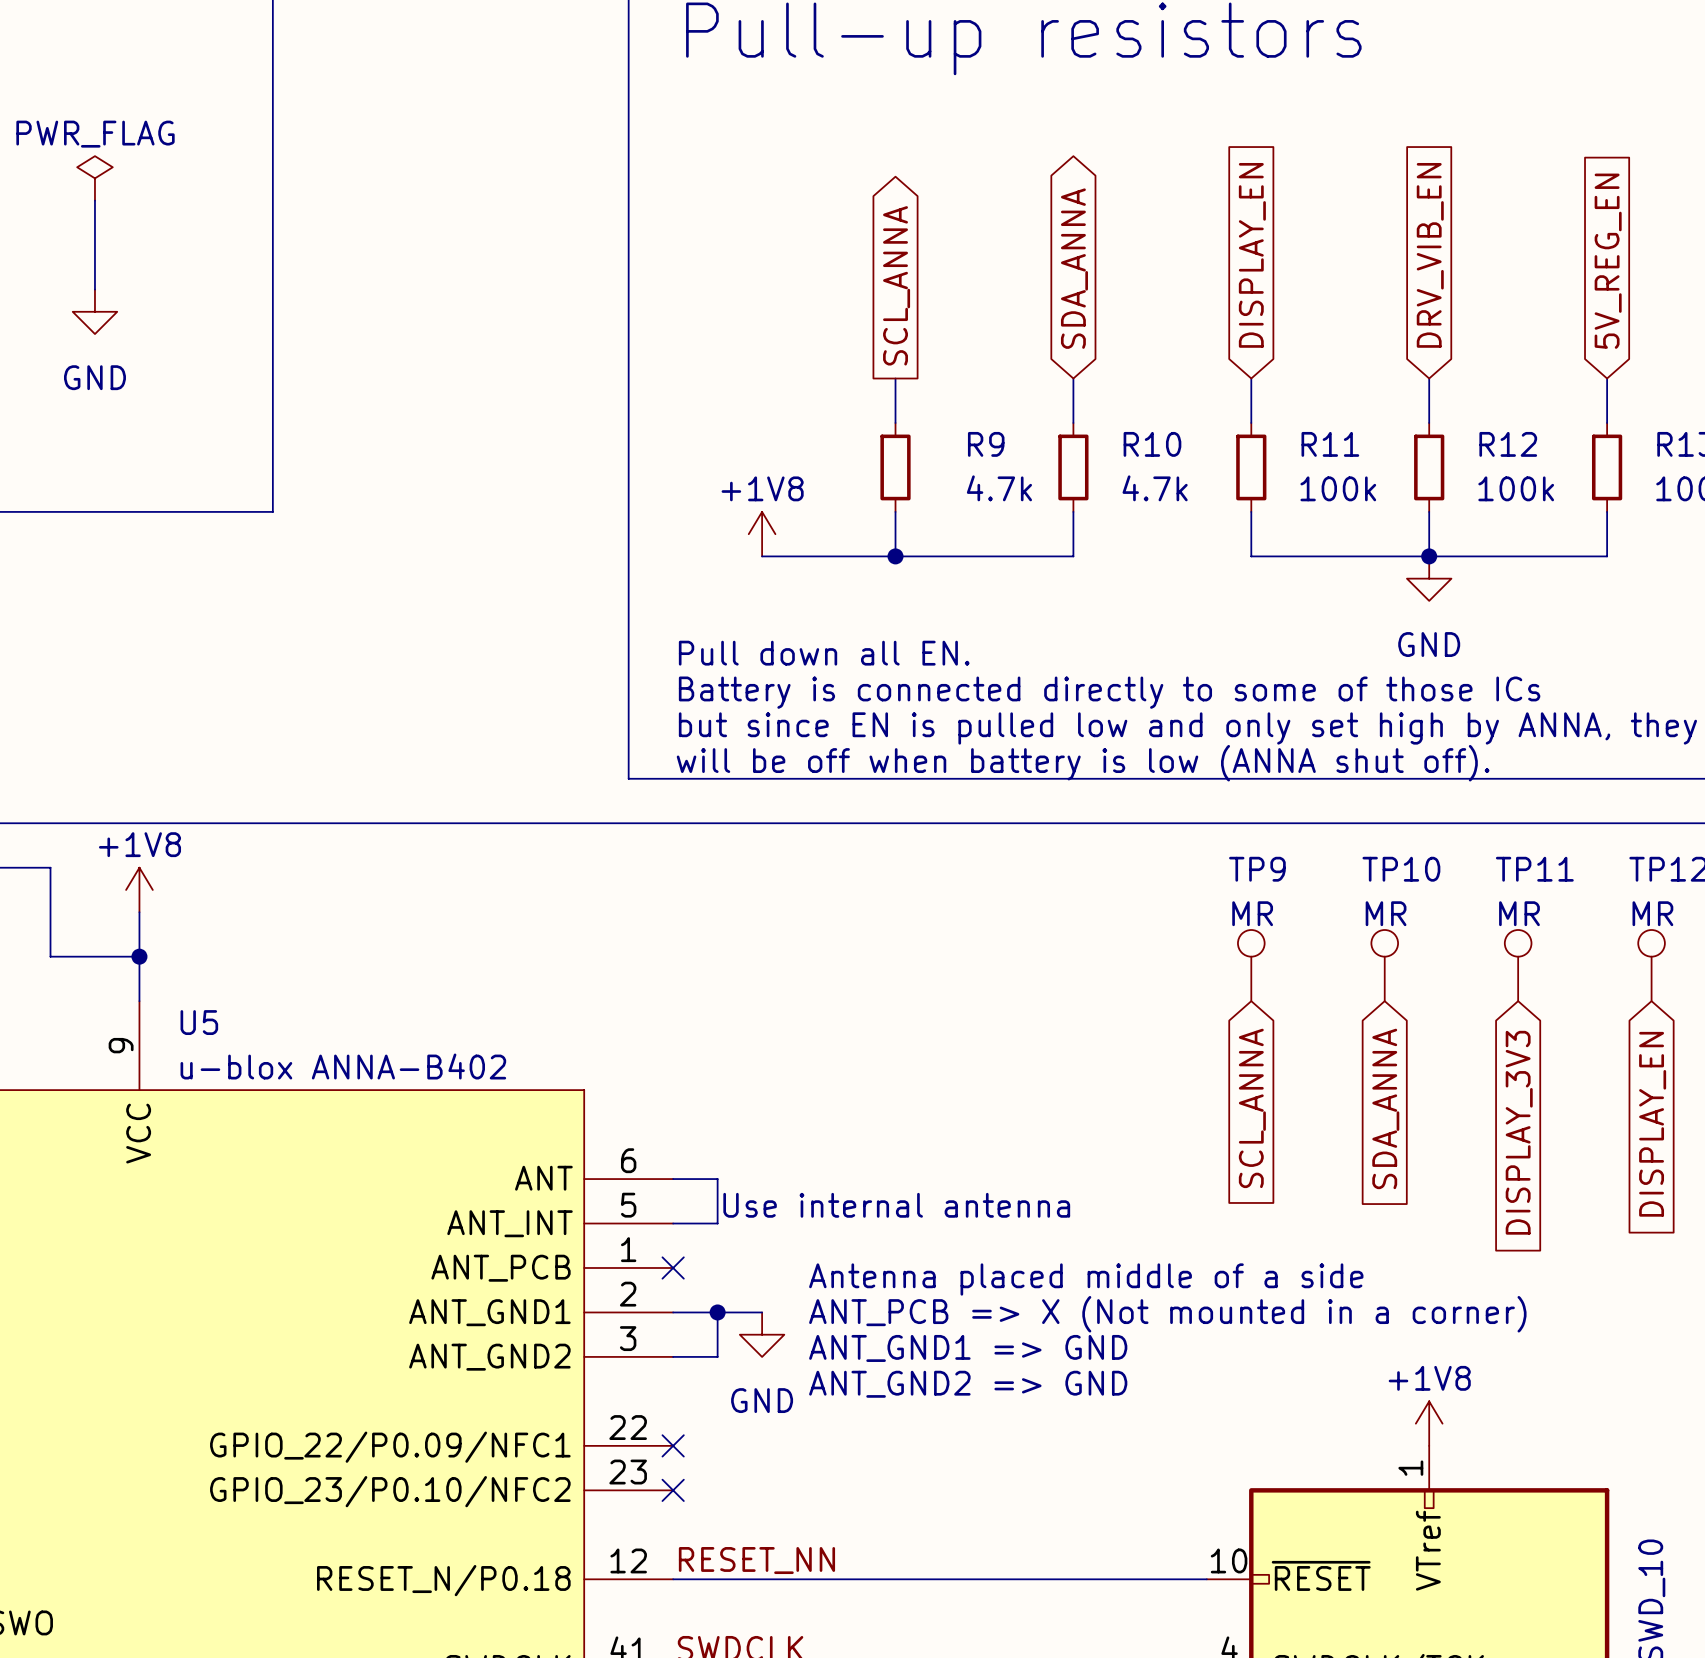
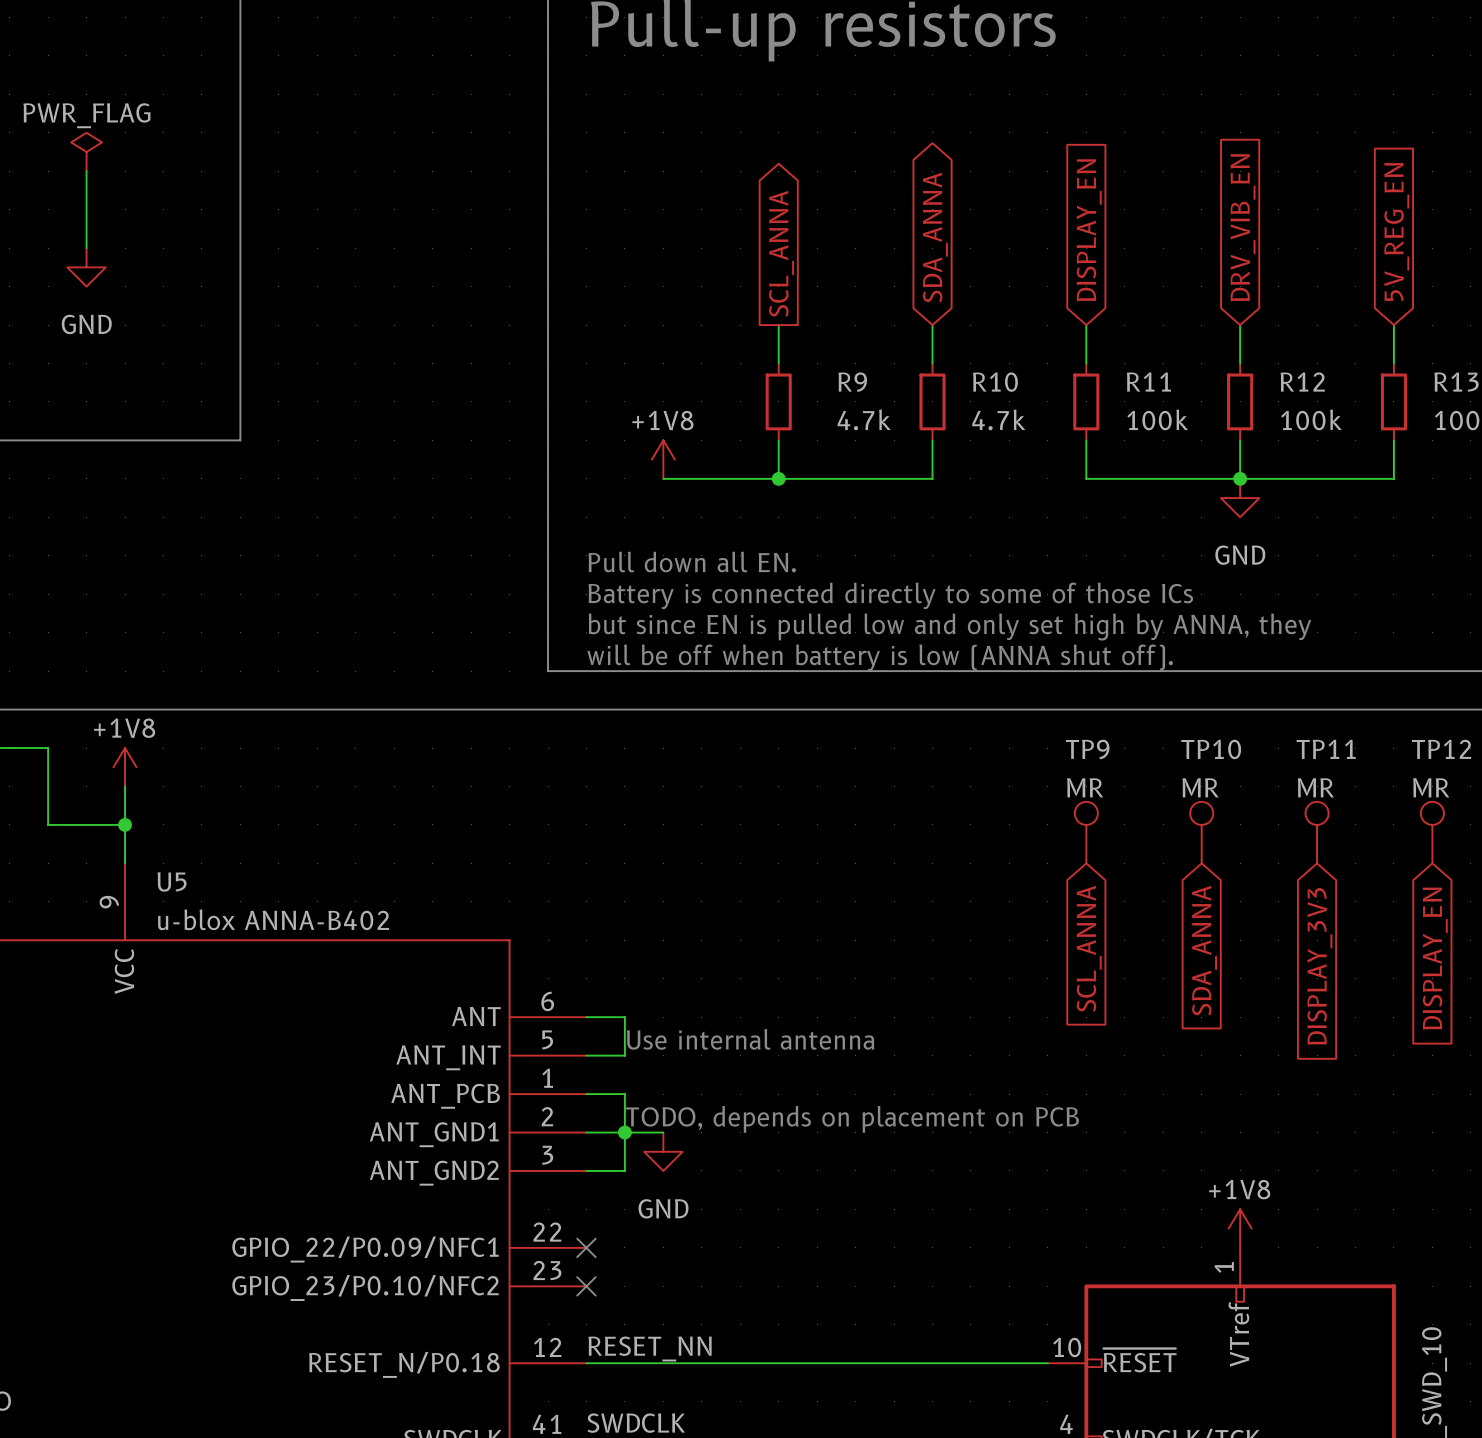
wire: none -> (586, 1094) (624, 1094) (624, 1132)
no-connect mark: (673, 1267) -> none
text: Antenna placed middle of a side (1086, 1279) -> none
text: none -> TODO, depends on placement on PCB (852, 1119)
text: ANT_PCB => X (Not mounted in a corner) (1167, 1314) -> none
text: ANT_GND1 => GND (968, 1348) -> none
text: ANT_GND2 => GND (968, 1384) -> none

